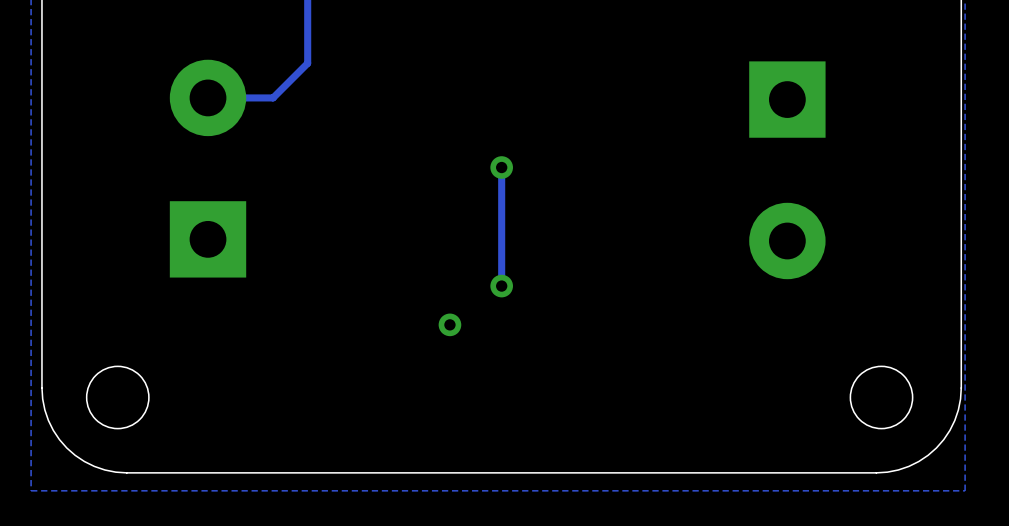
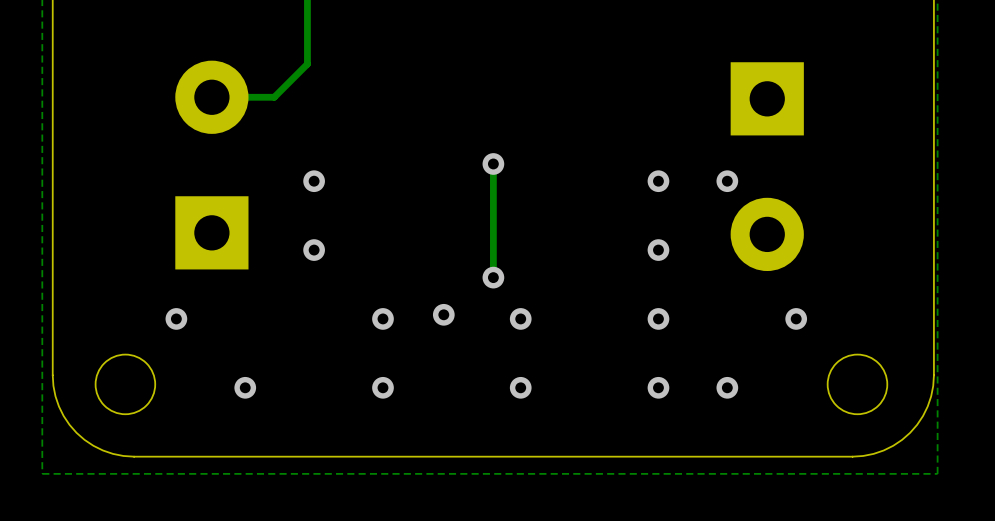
via: none -> (314, 181)
via: none -> (658, 181)
via: none -> (727, 181)
via: none -> (314, 250)
via: none -> (658, 250)
via: none -> (176, 318)
via: none -> (382, 318)
via: none -> (520, 318)
via: none -> (658, 318)
via: none -> (796, 318)
via: none -> (245, 387)
via: none -> (382, 387)
via: none -> (520, 387)
via: none -> (658, 387)
via: none -> (727, 387)

